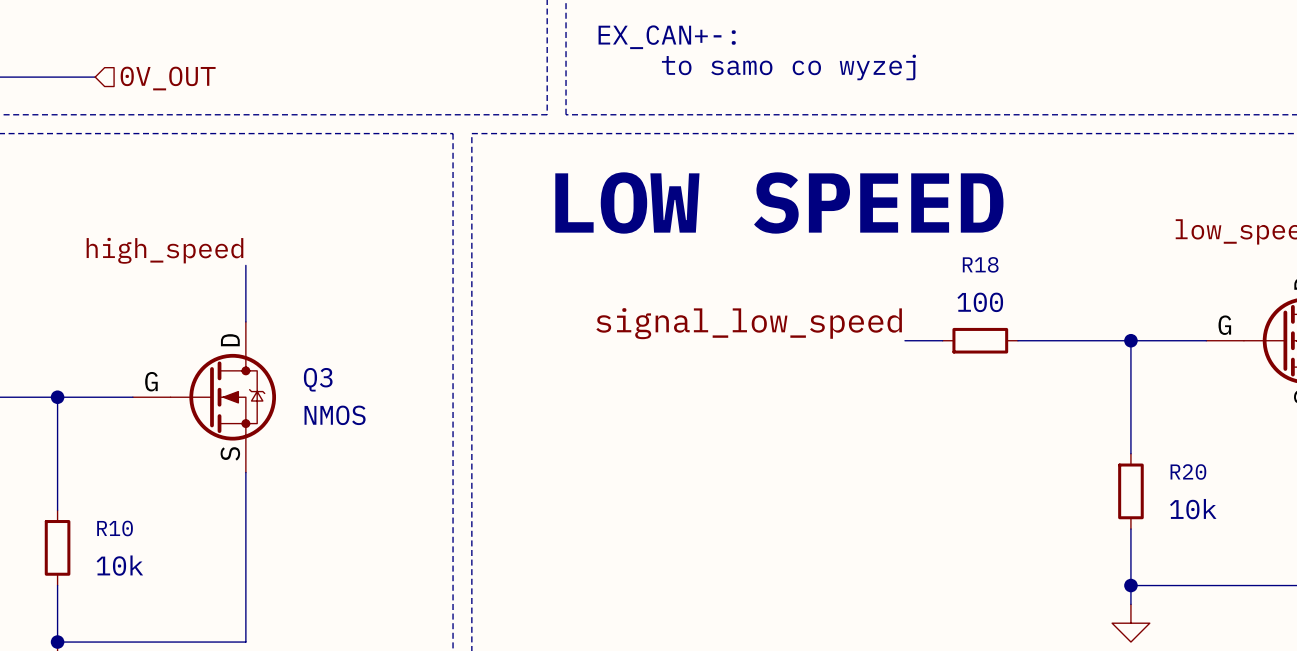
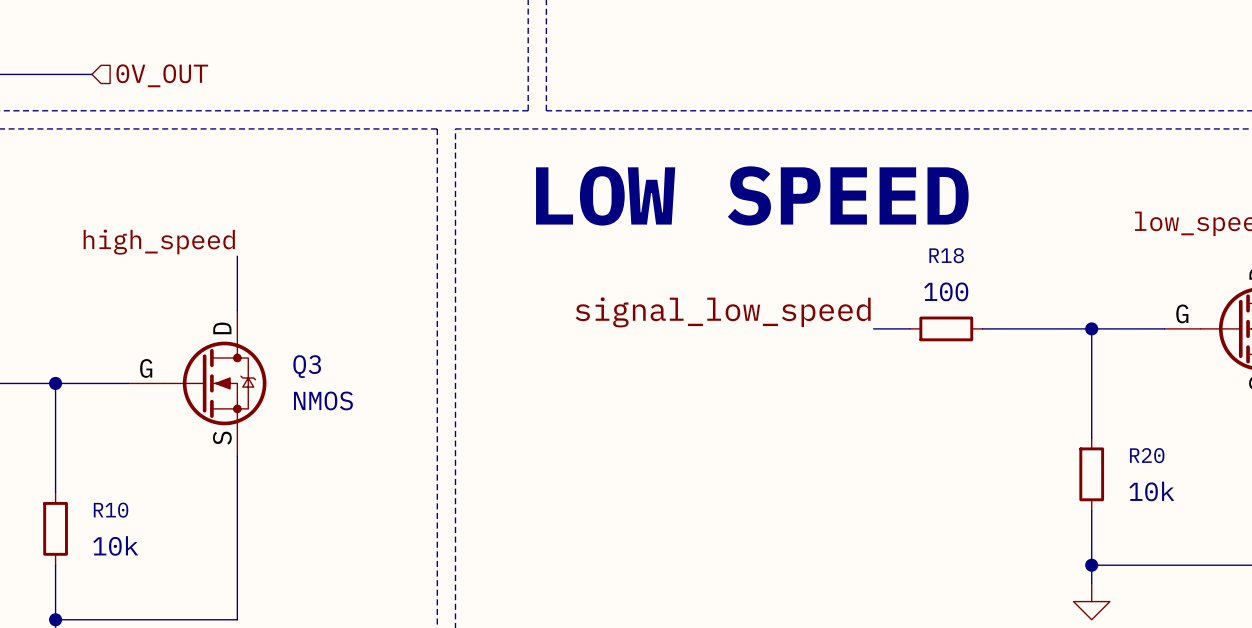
text: EX_CAN+-: (667, 37) -> none
text: to samo co wyzej (788, 67) -> none

